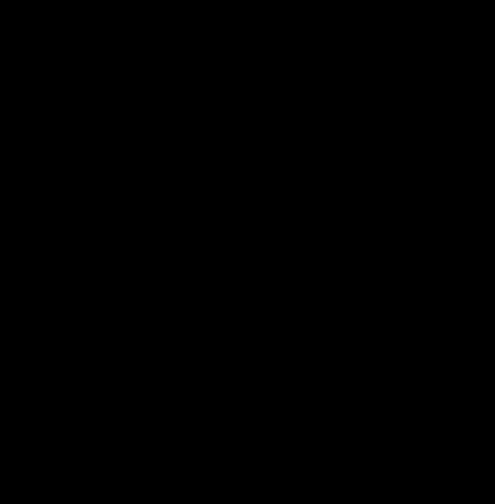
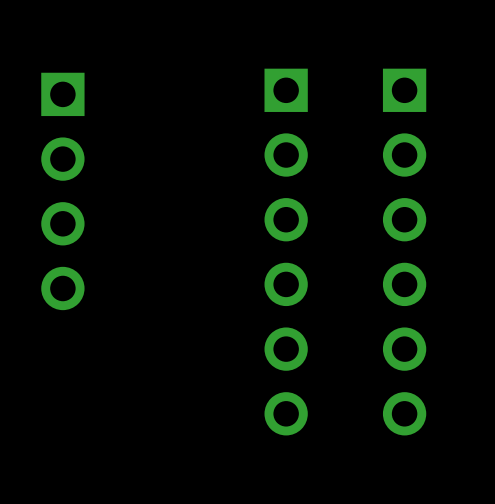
part: none -> (62, 191)
part: none -> (286, 252)
part: none -> (404, 252)

